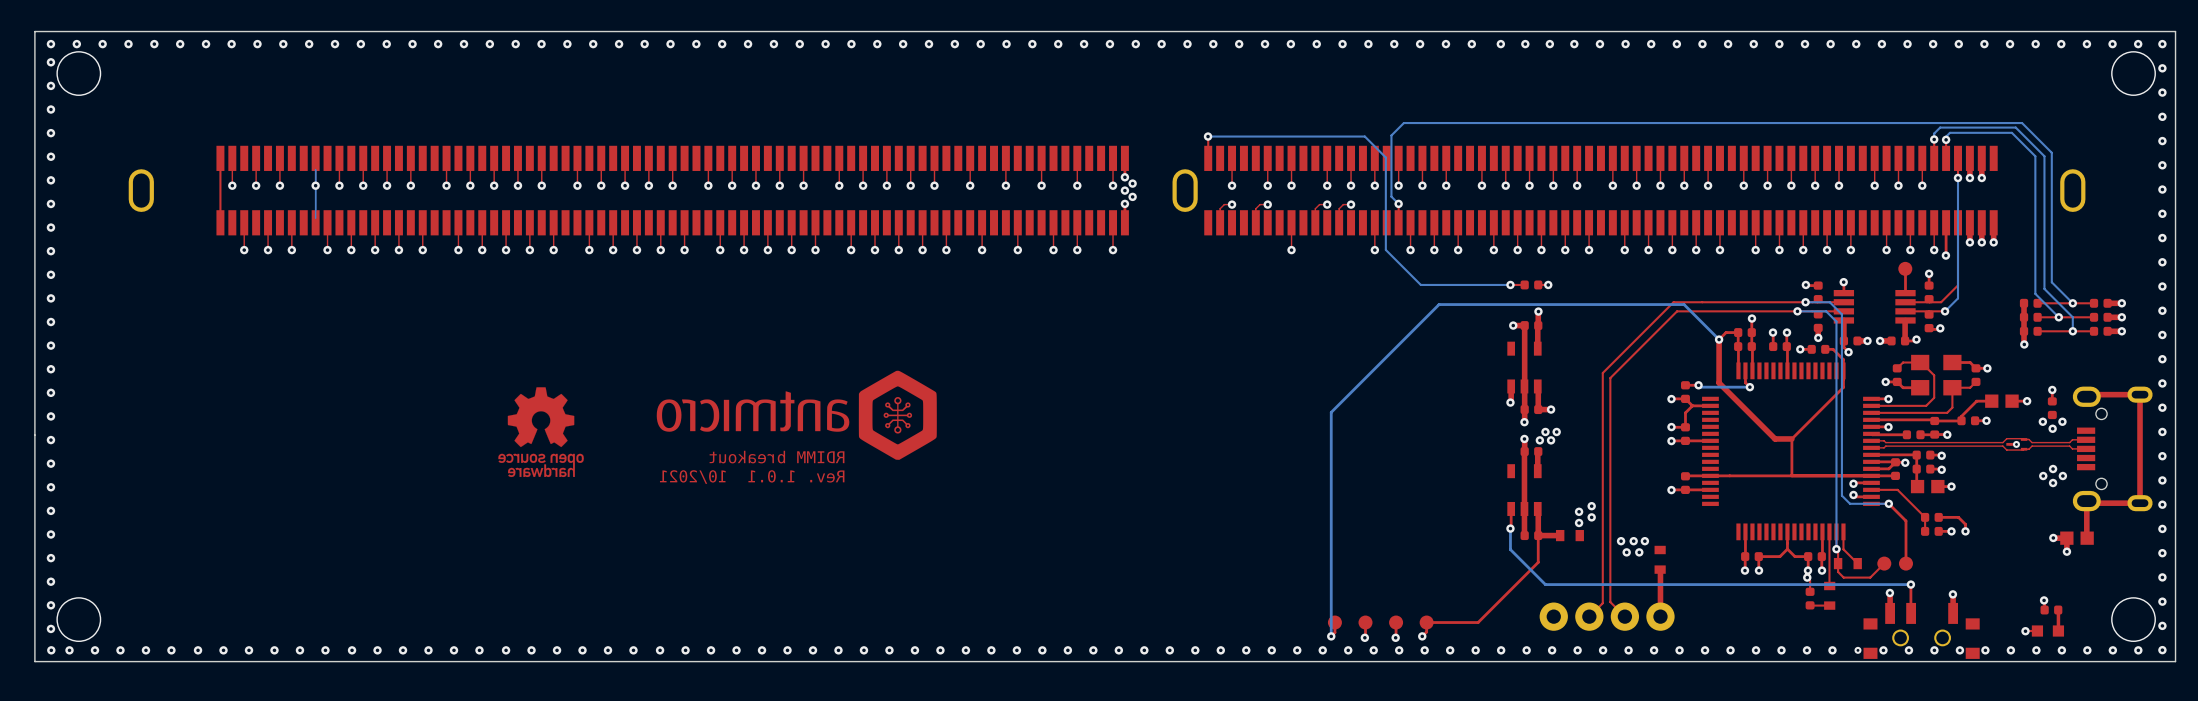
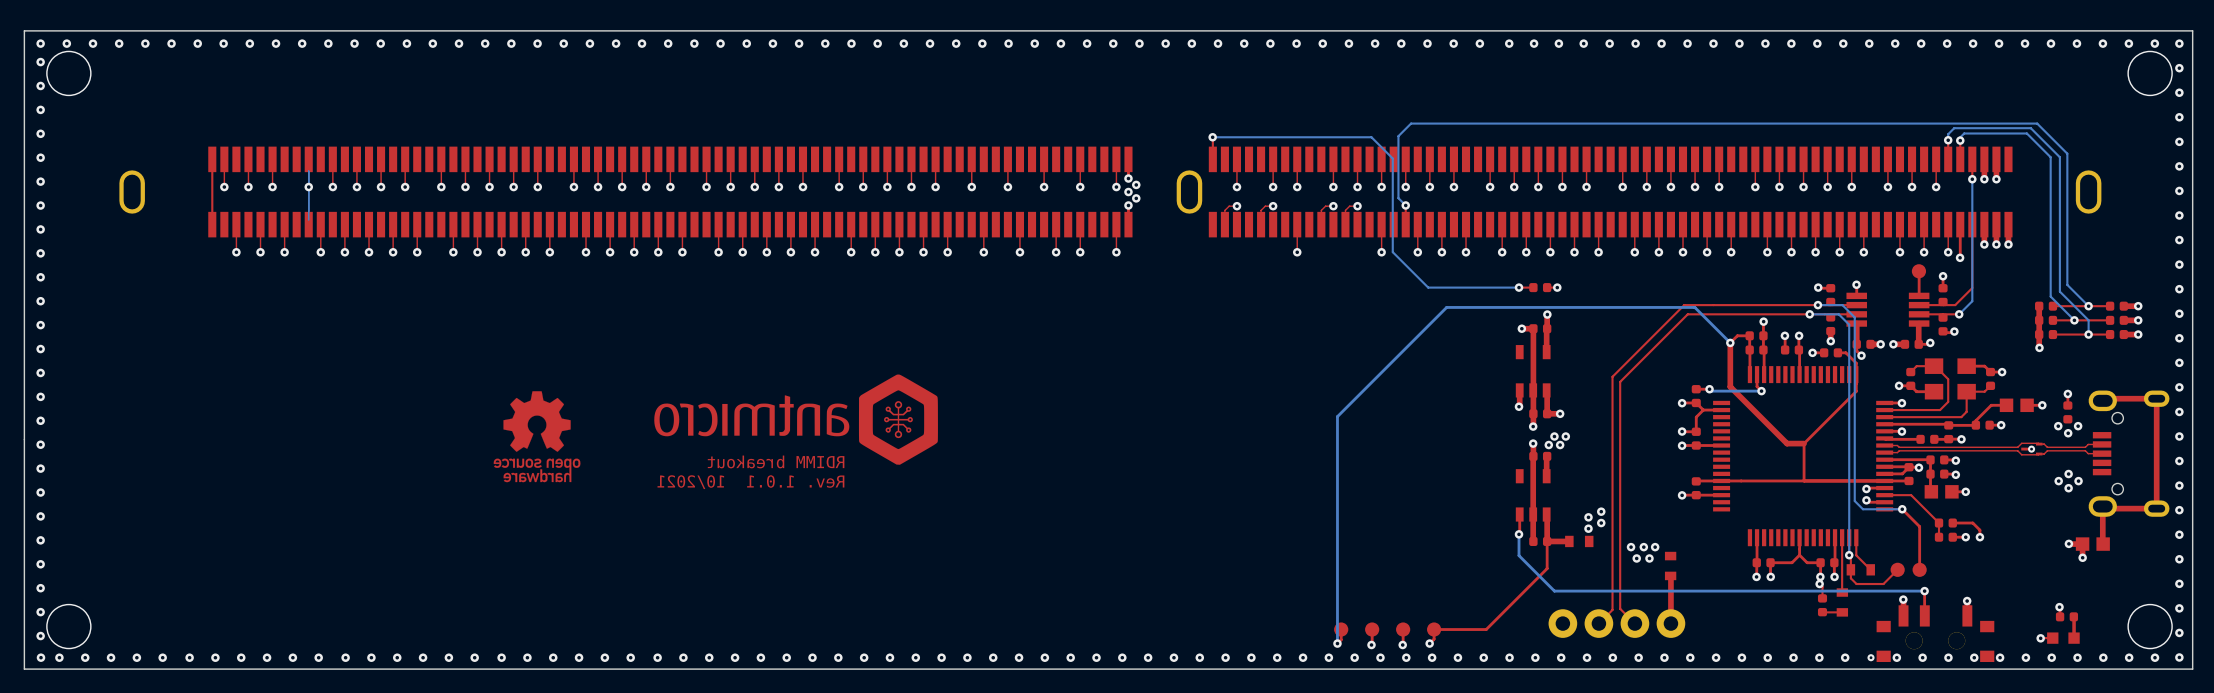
part footprint: [1863, 602, 1980, 659] -> [1876, 605, 1995, 663]

